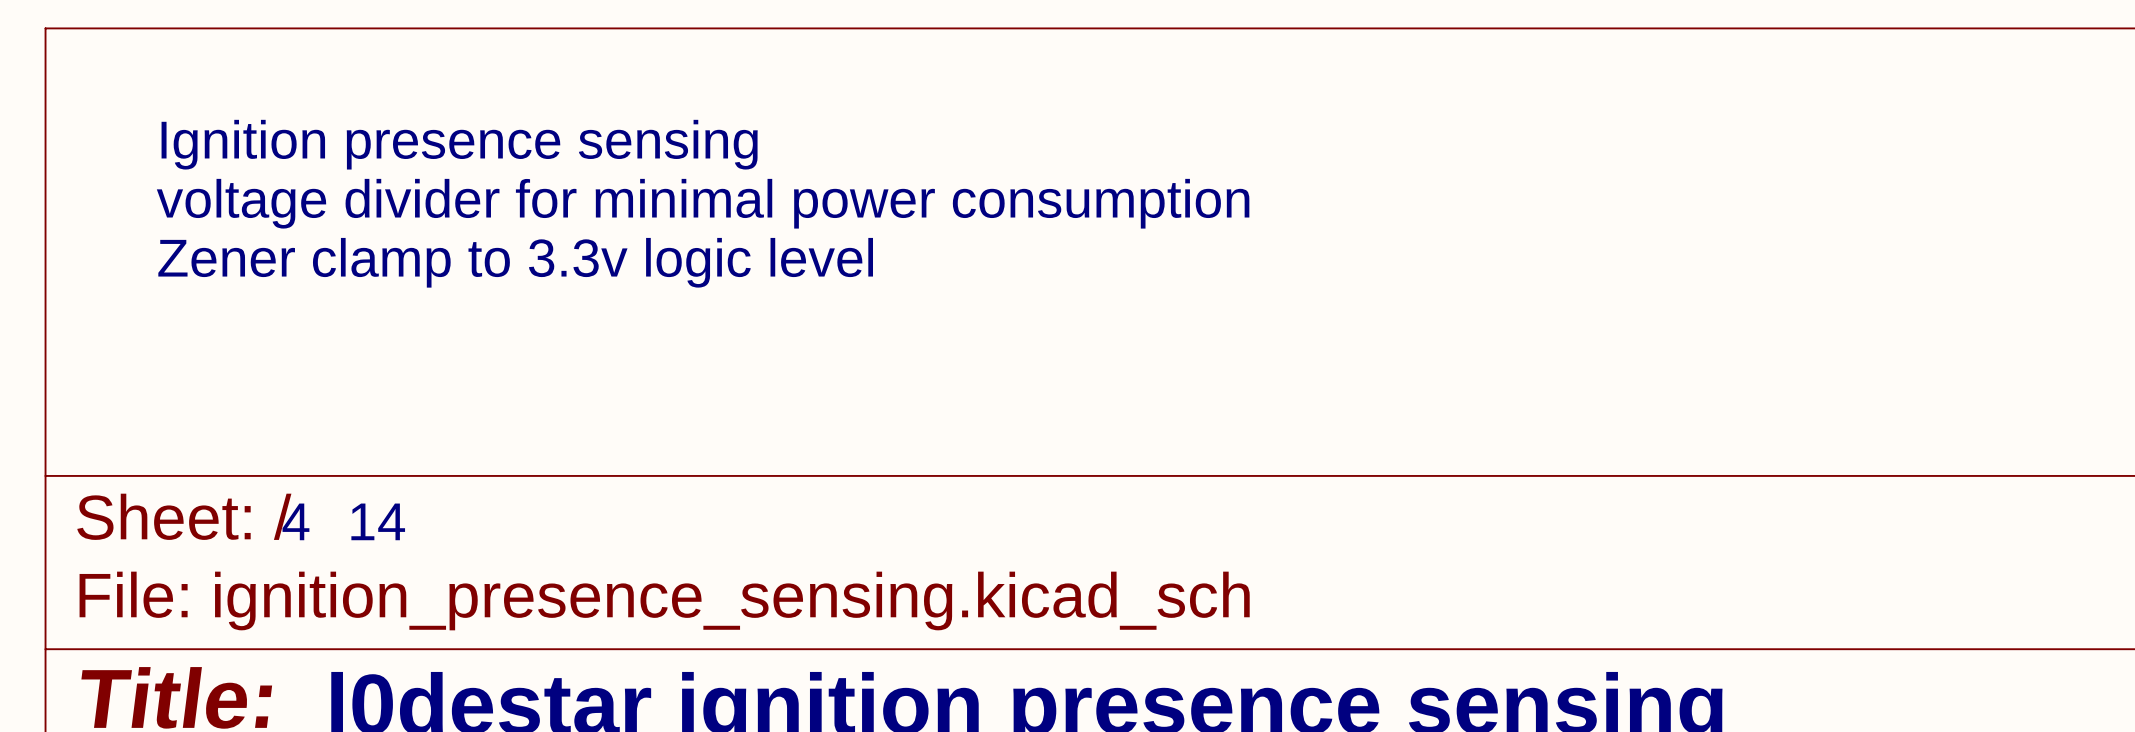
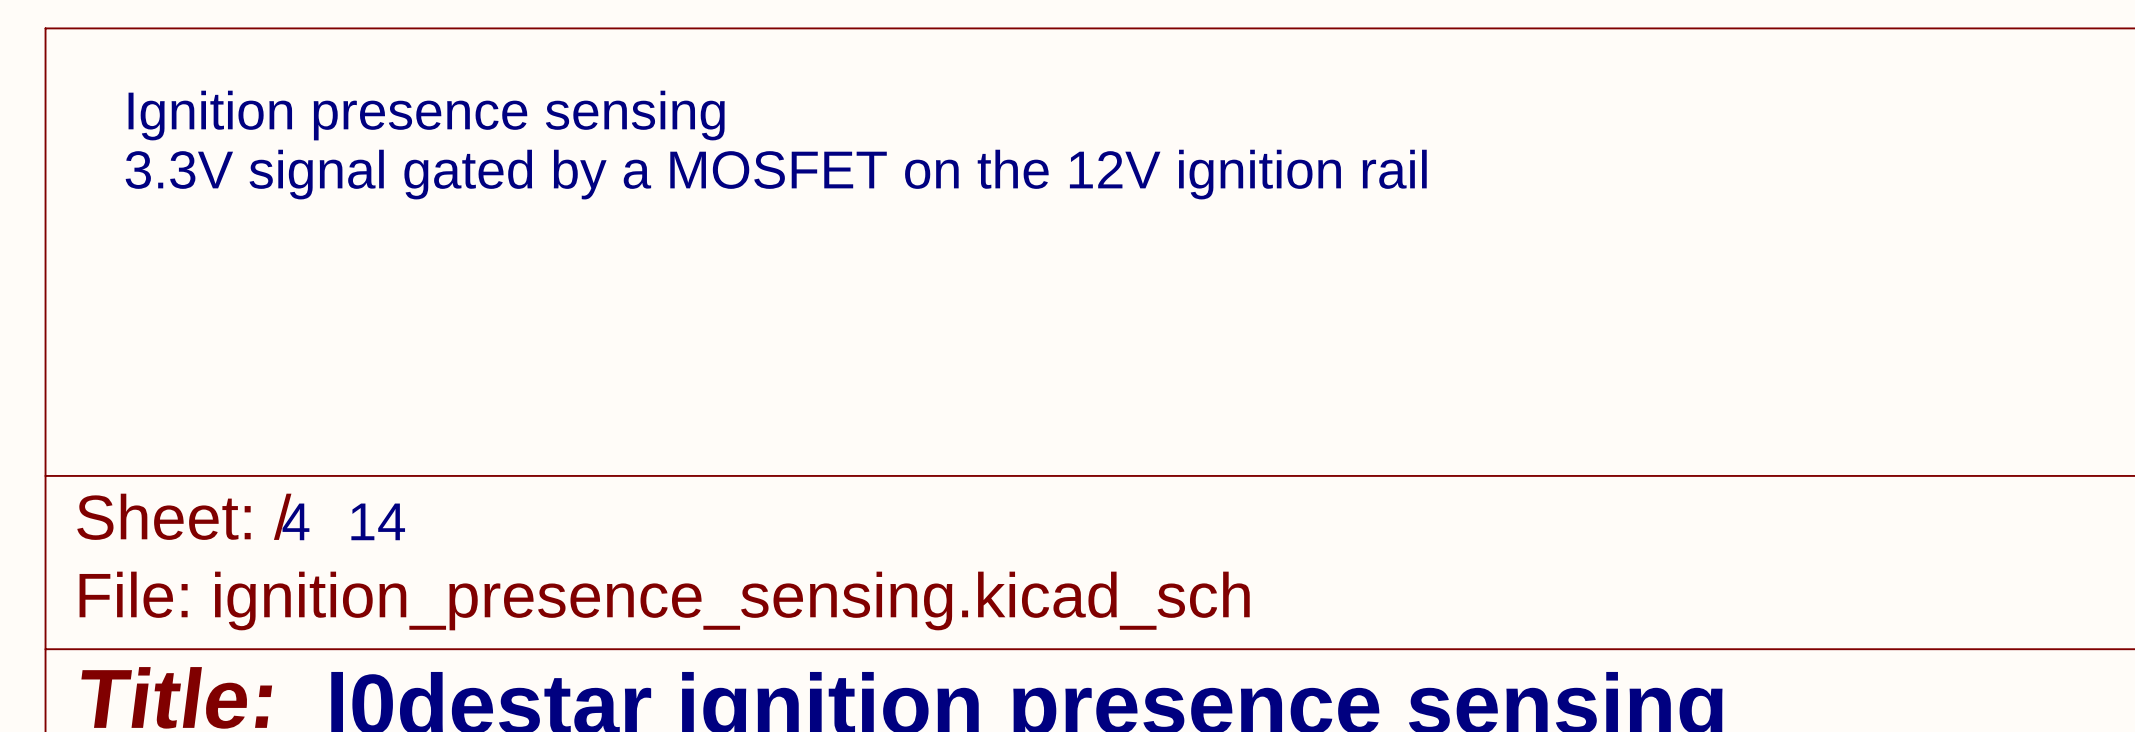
text position: Ignition presence sensing (459, 144) -> Ignition presence sensing (426, 115)
text: none -> 3.3V signal gated by a MOSFET on the 12V ignition rail (776, 174)
text: voltage divider for minimal power consumption (703, 203) -> none
text: Zener clamp to 3.3v logic level (515, 262) -> none

